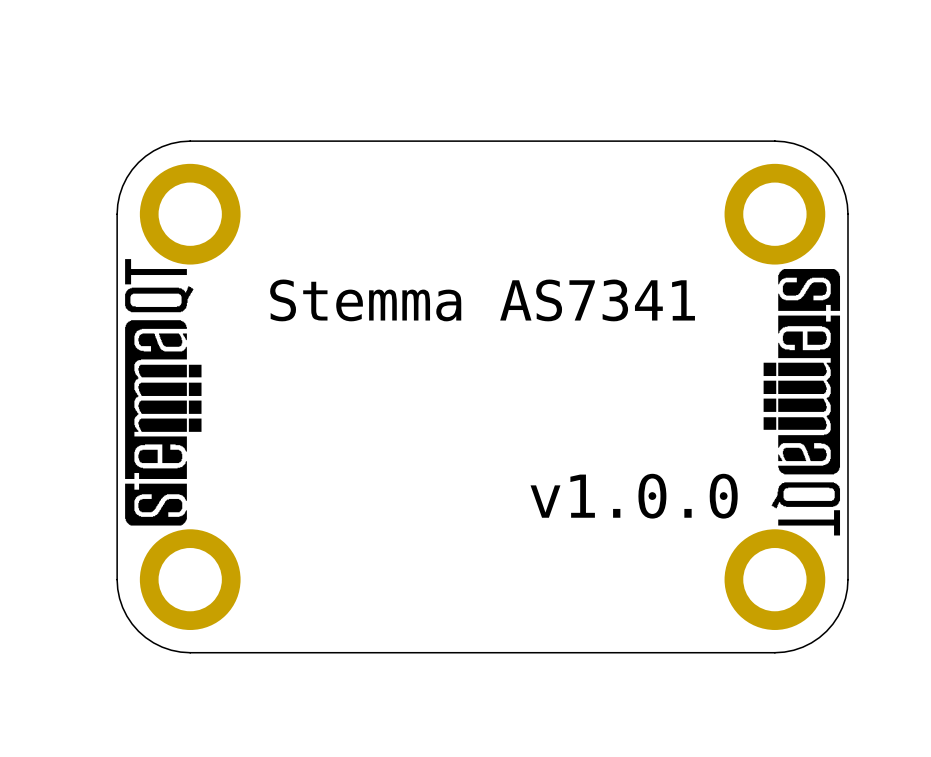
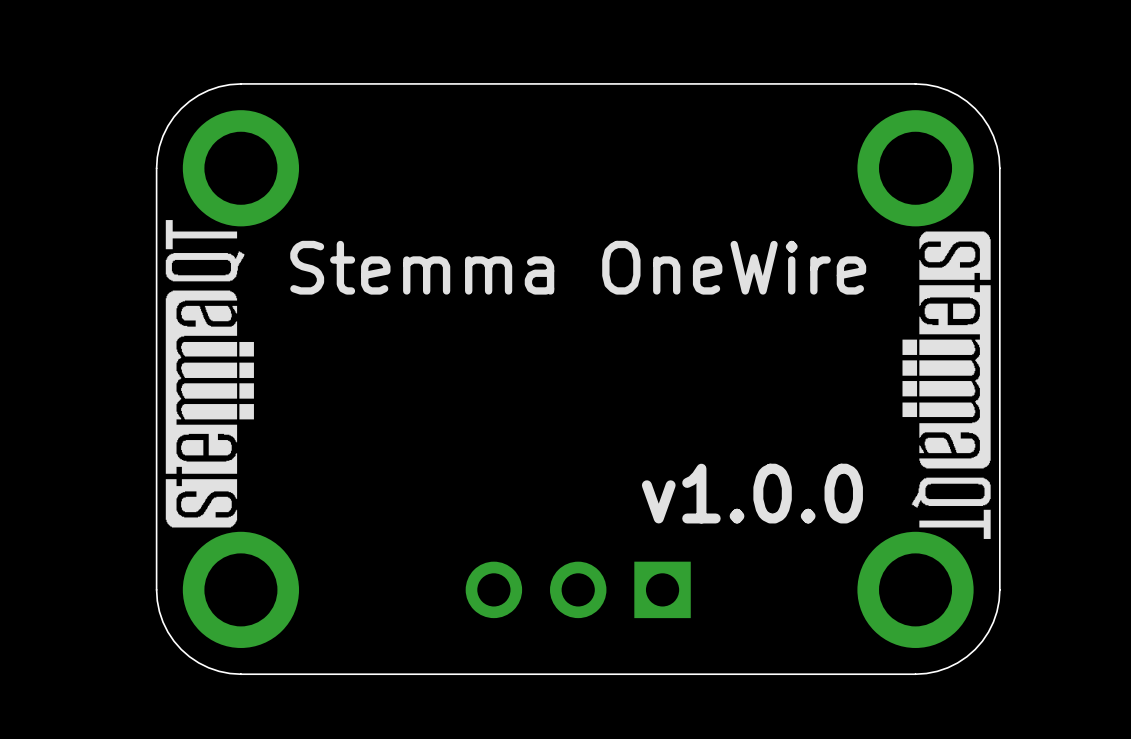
text: Stemma AS7341 (482, 300) -> Stemma OneWire (578, 267)
part: none -> (578, 589)

